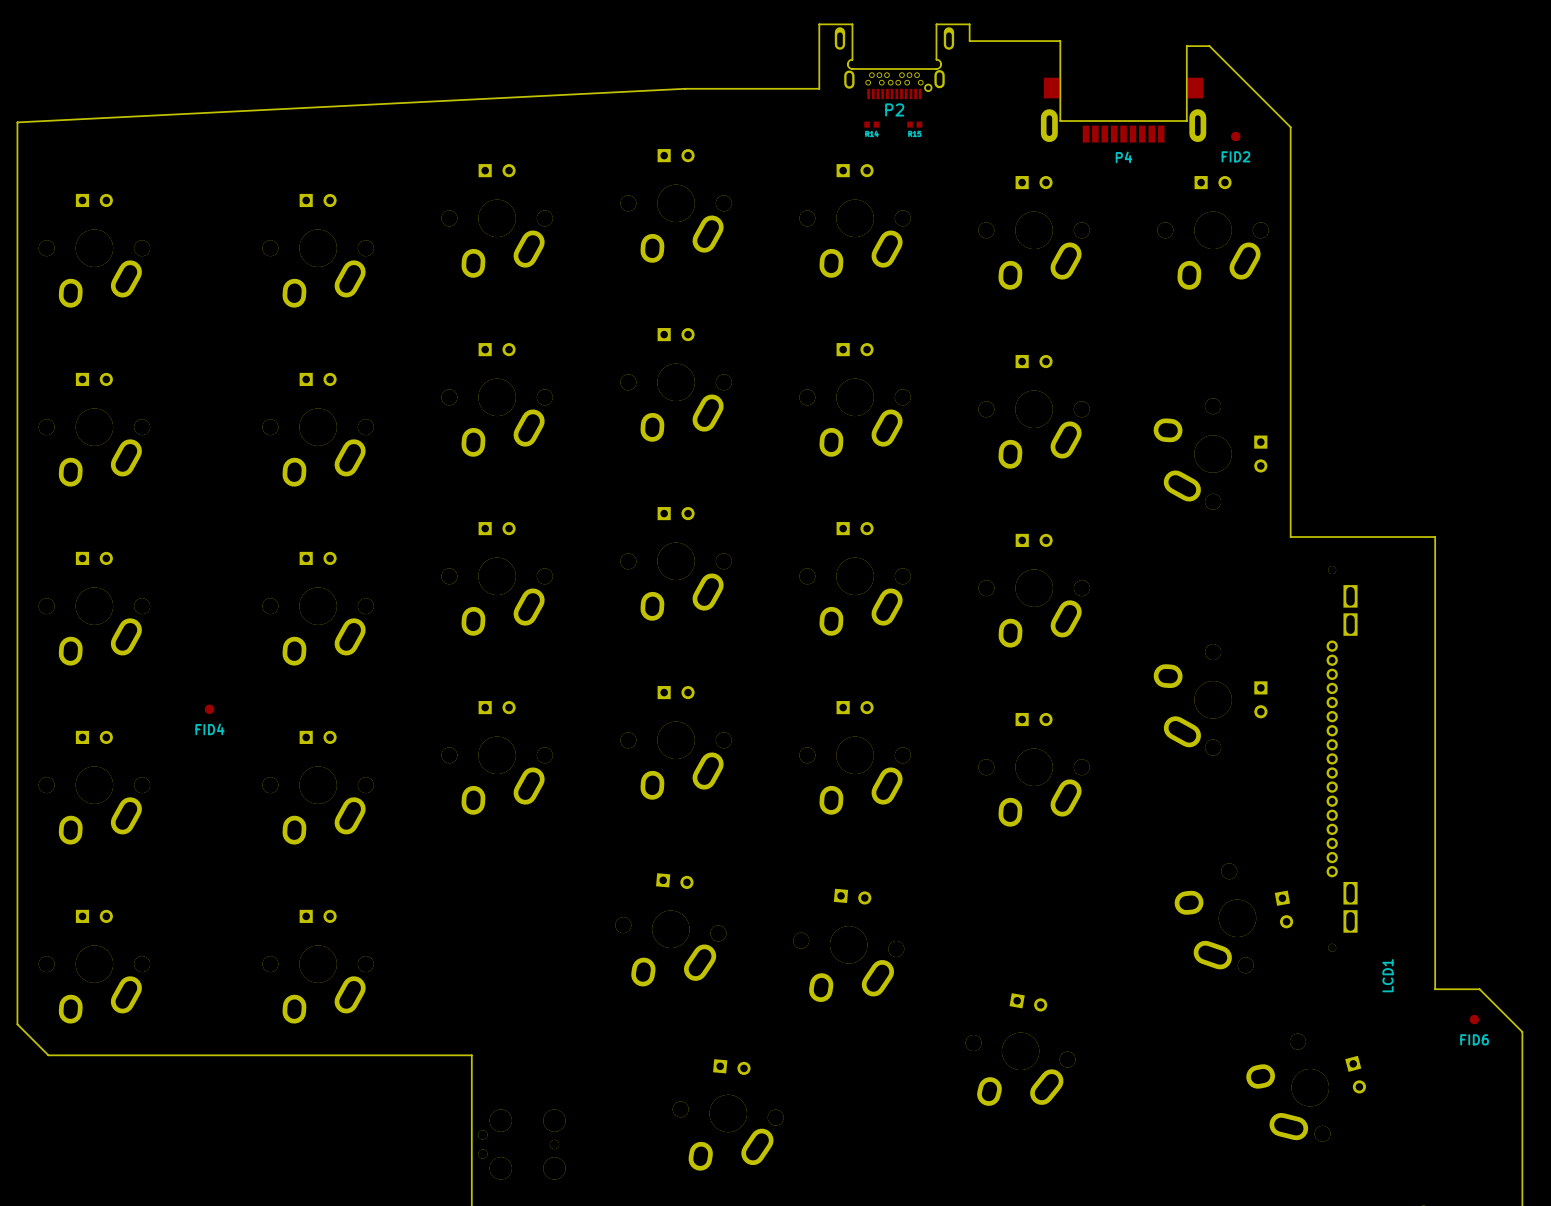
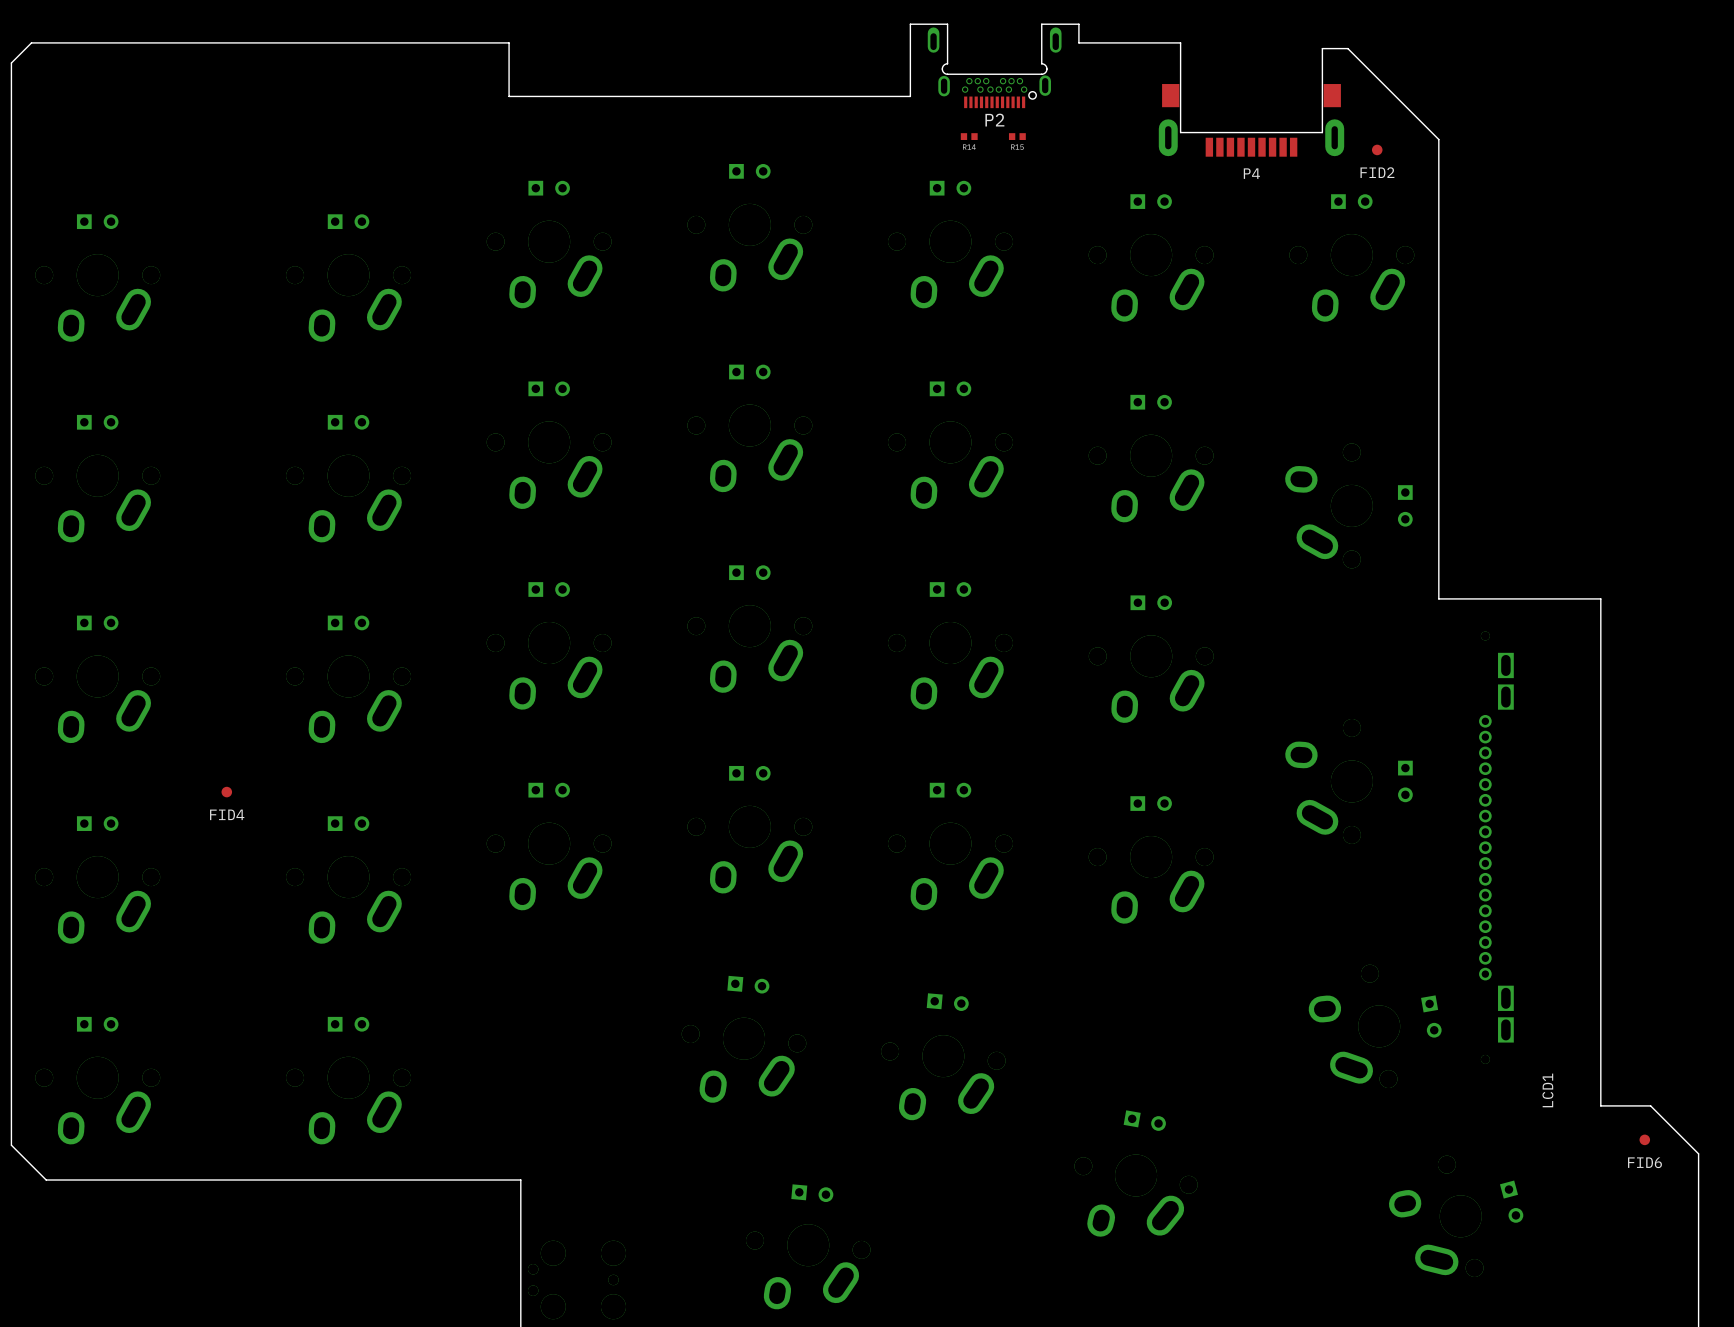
board edge: (685, 88) (17, 122) -> (759, 96) (509, 96) (509, 42) (31, 42) (11, 63) (11, 134)

